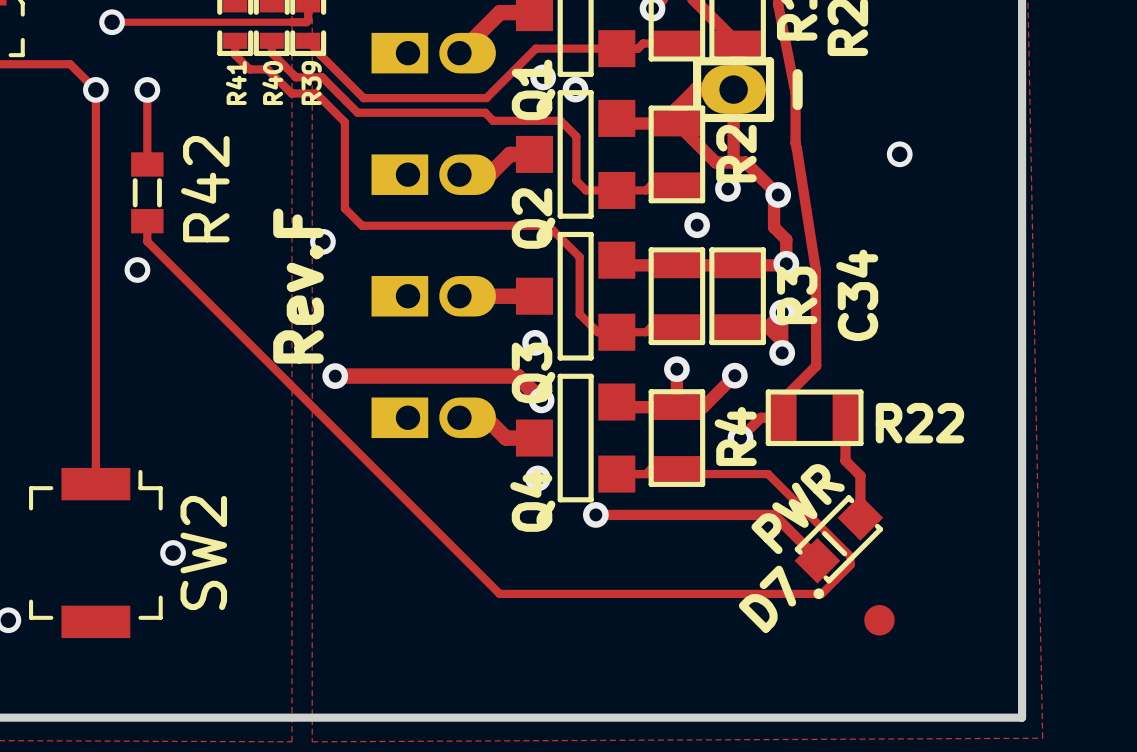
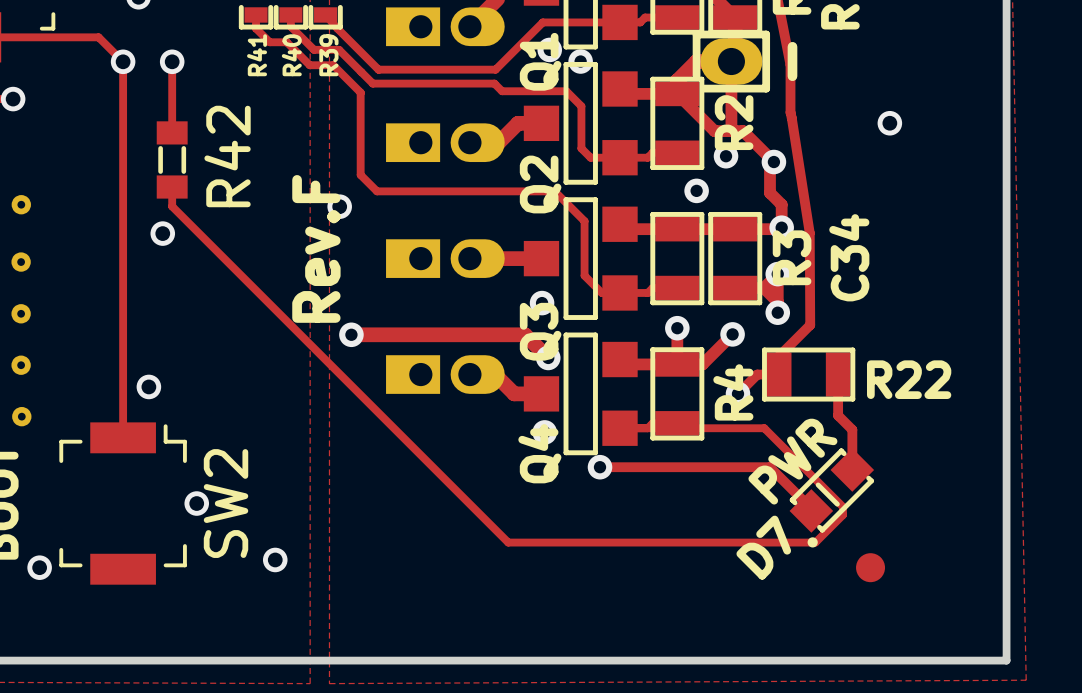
via: none -> (148, 386)
via: none -> (275, 559)

